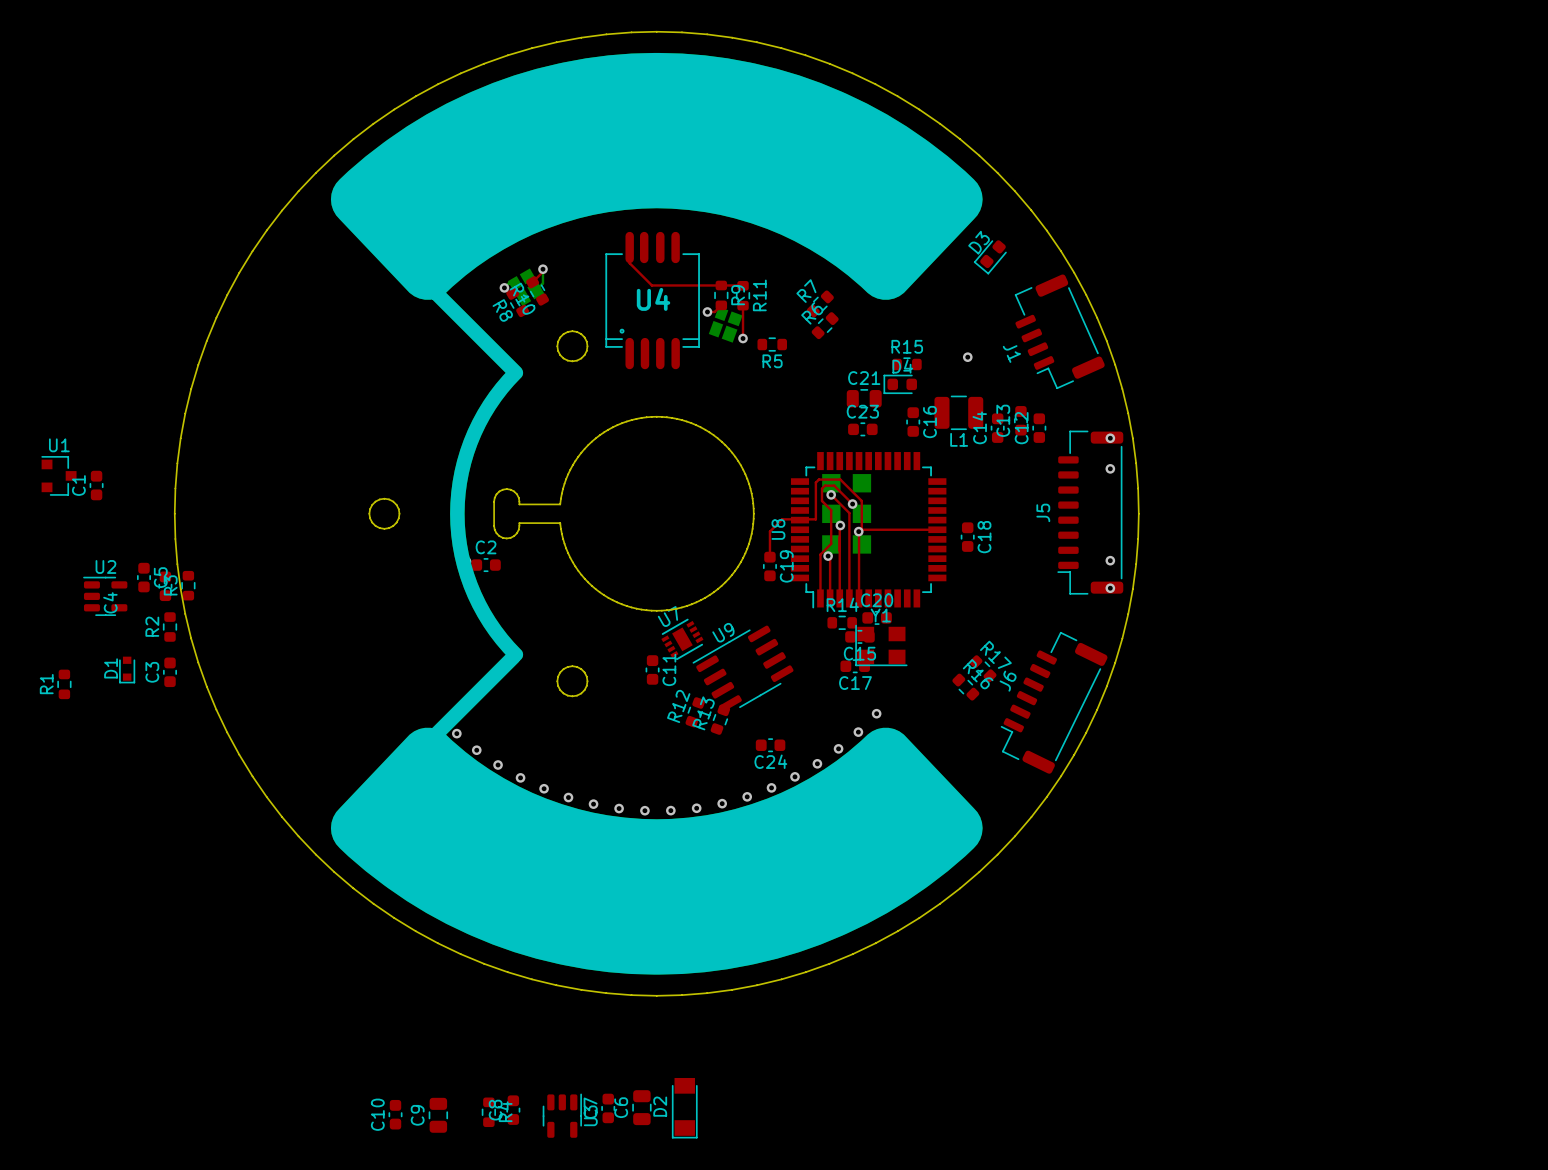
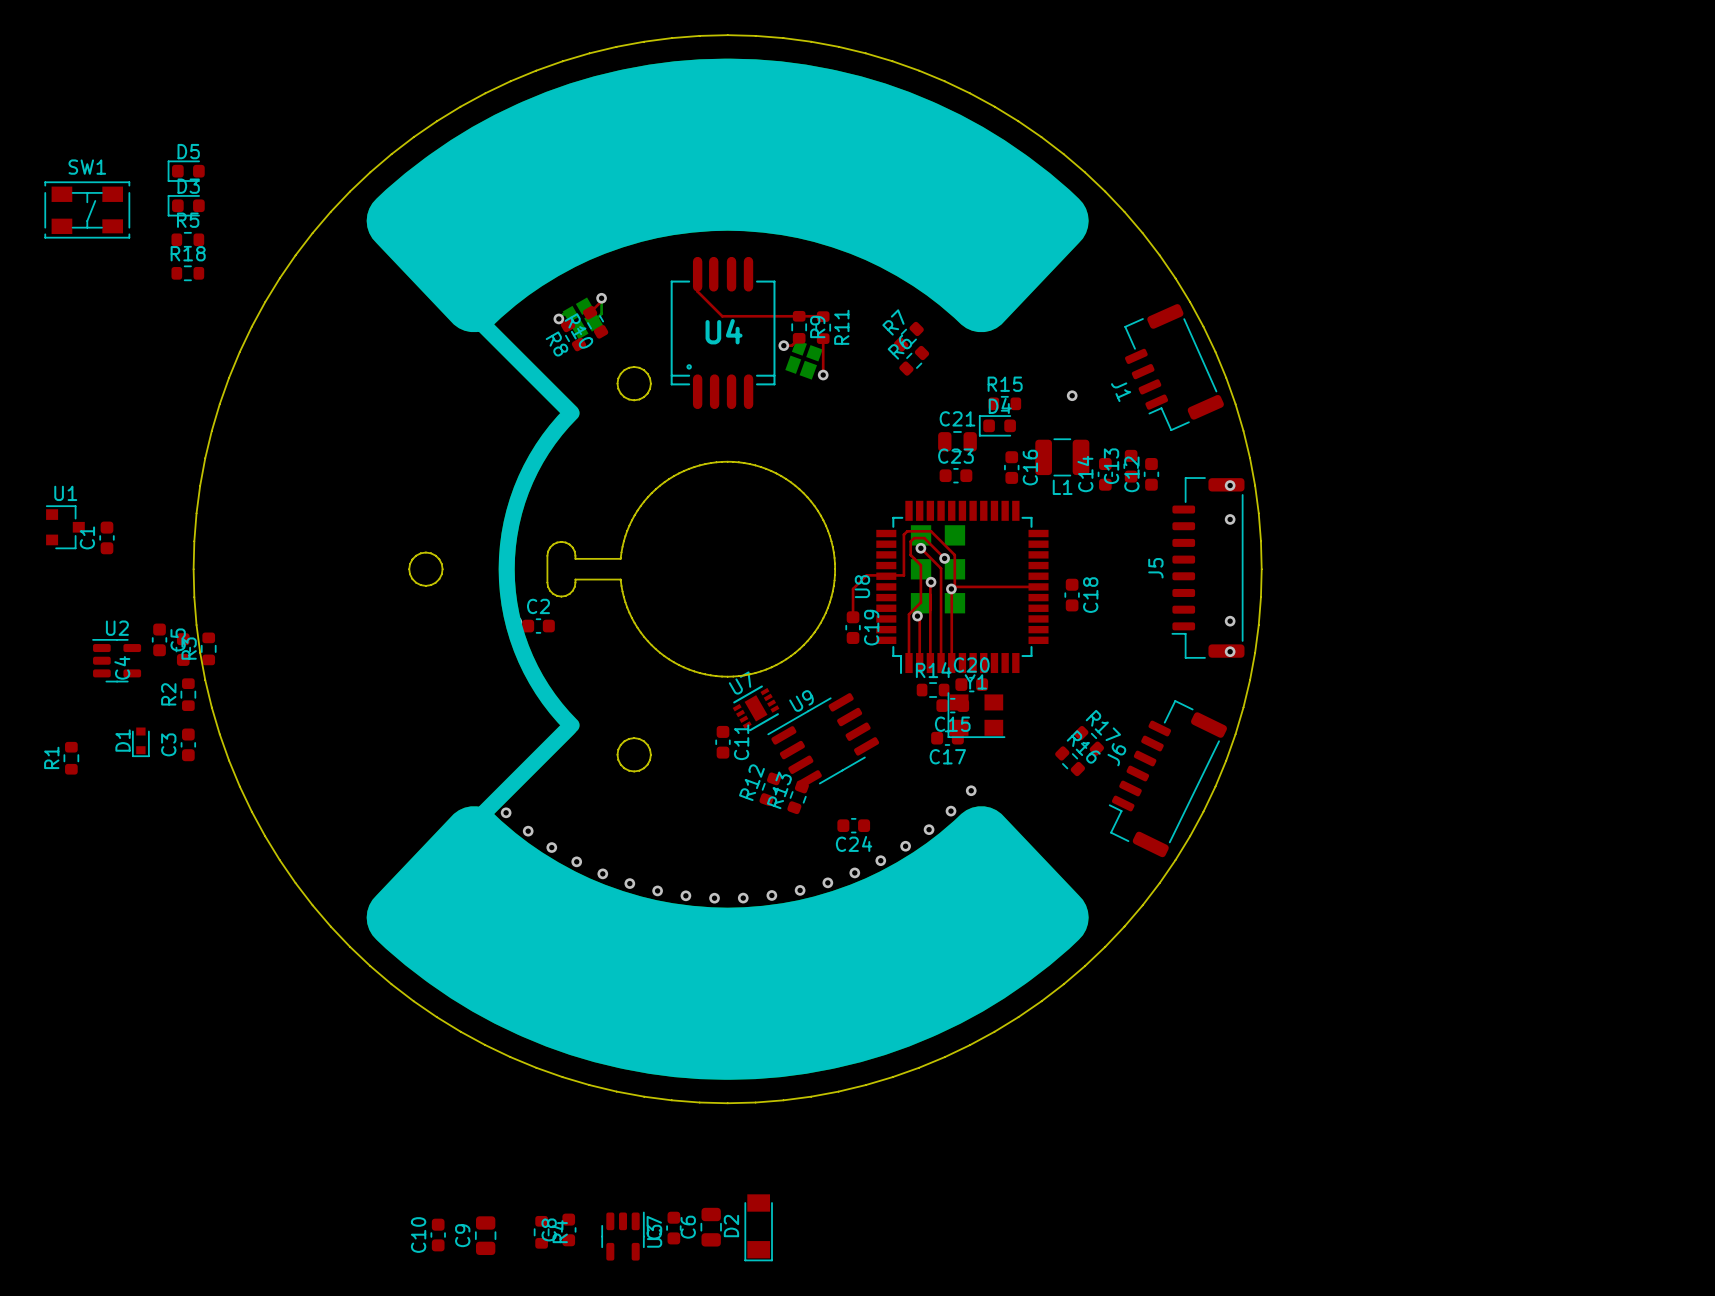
D5: none -> (186, 171)
SW1: none -> (87, 209)
R18: none -> (187, 273)
D3 rotation: 0° (990, 257) -> 50° clockwise (186, 205)
D3 position: (990, 257) -> (186, 205)
R5 position: (772, 344) -> (187, 239)
R5 name position: R5 (772, 361) -> R5 (188, 220)

